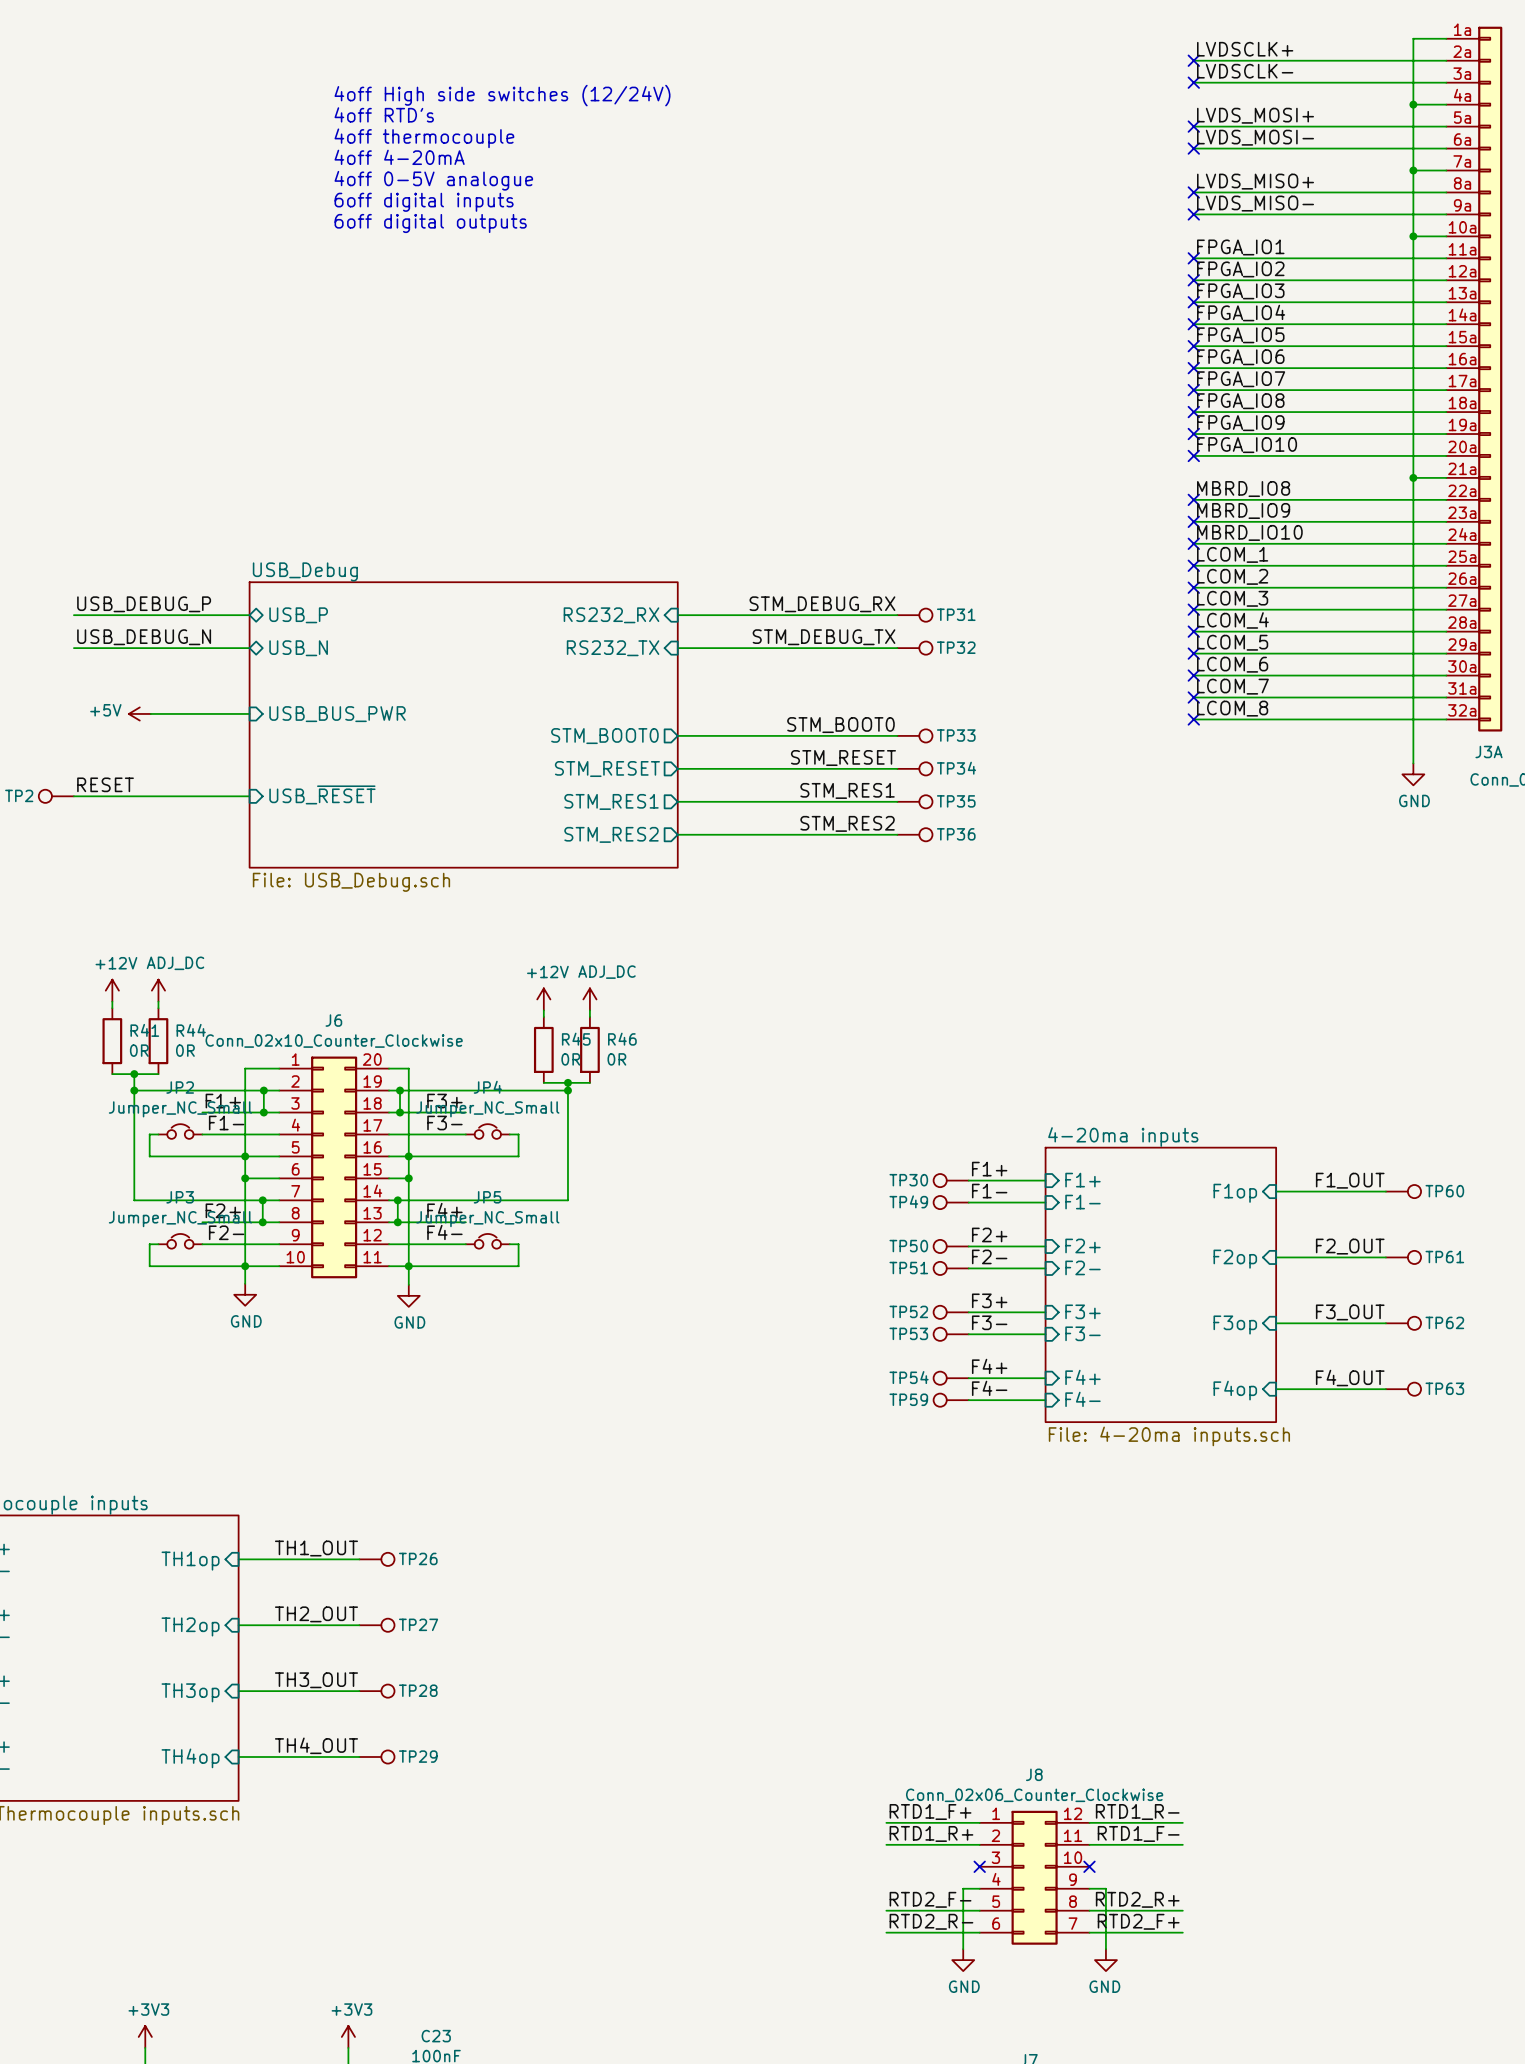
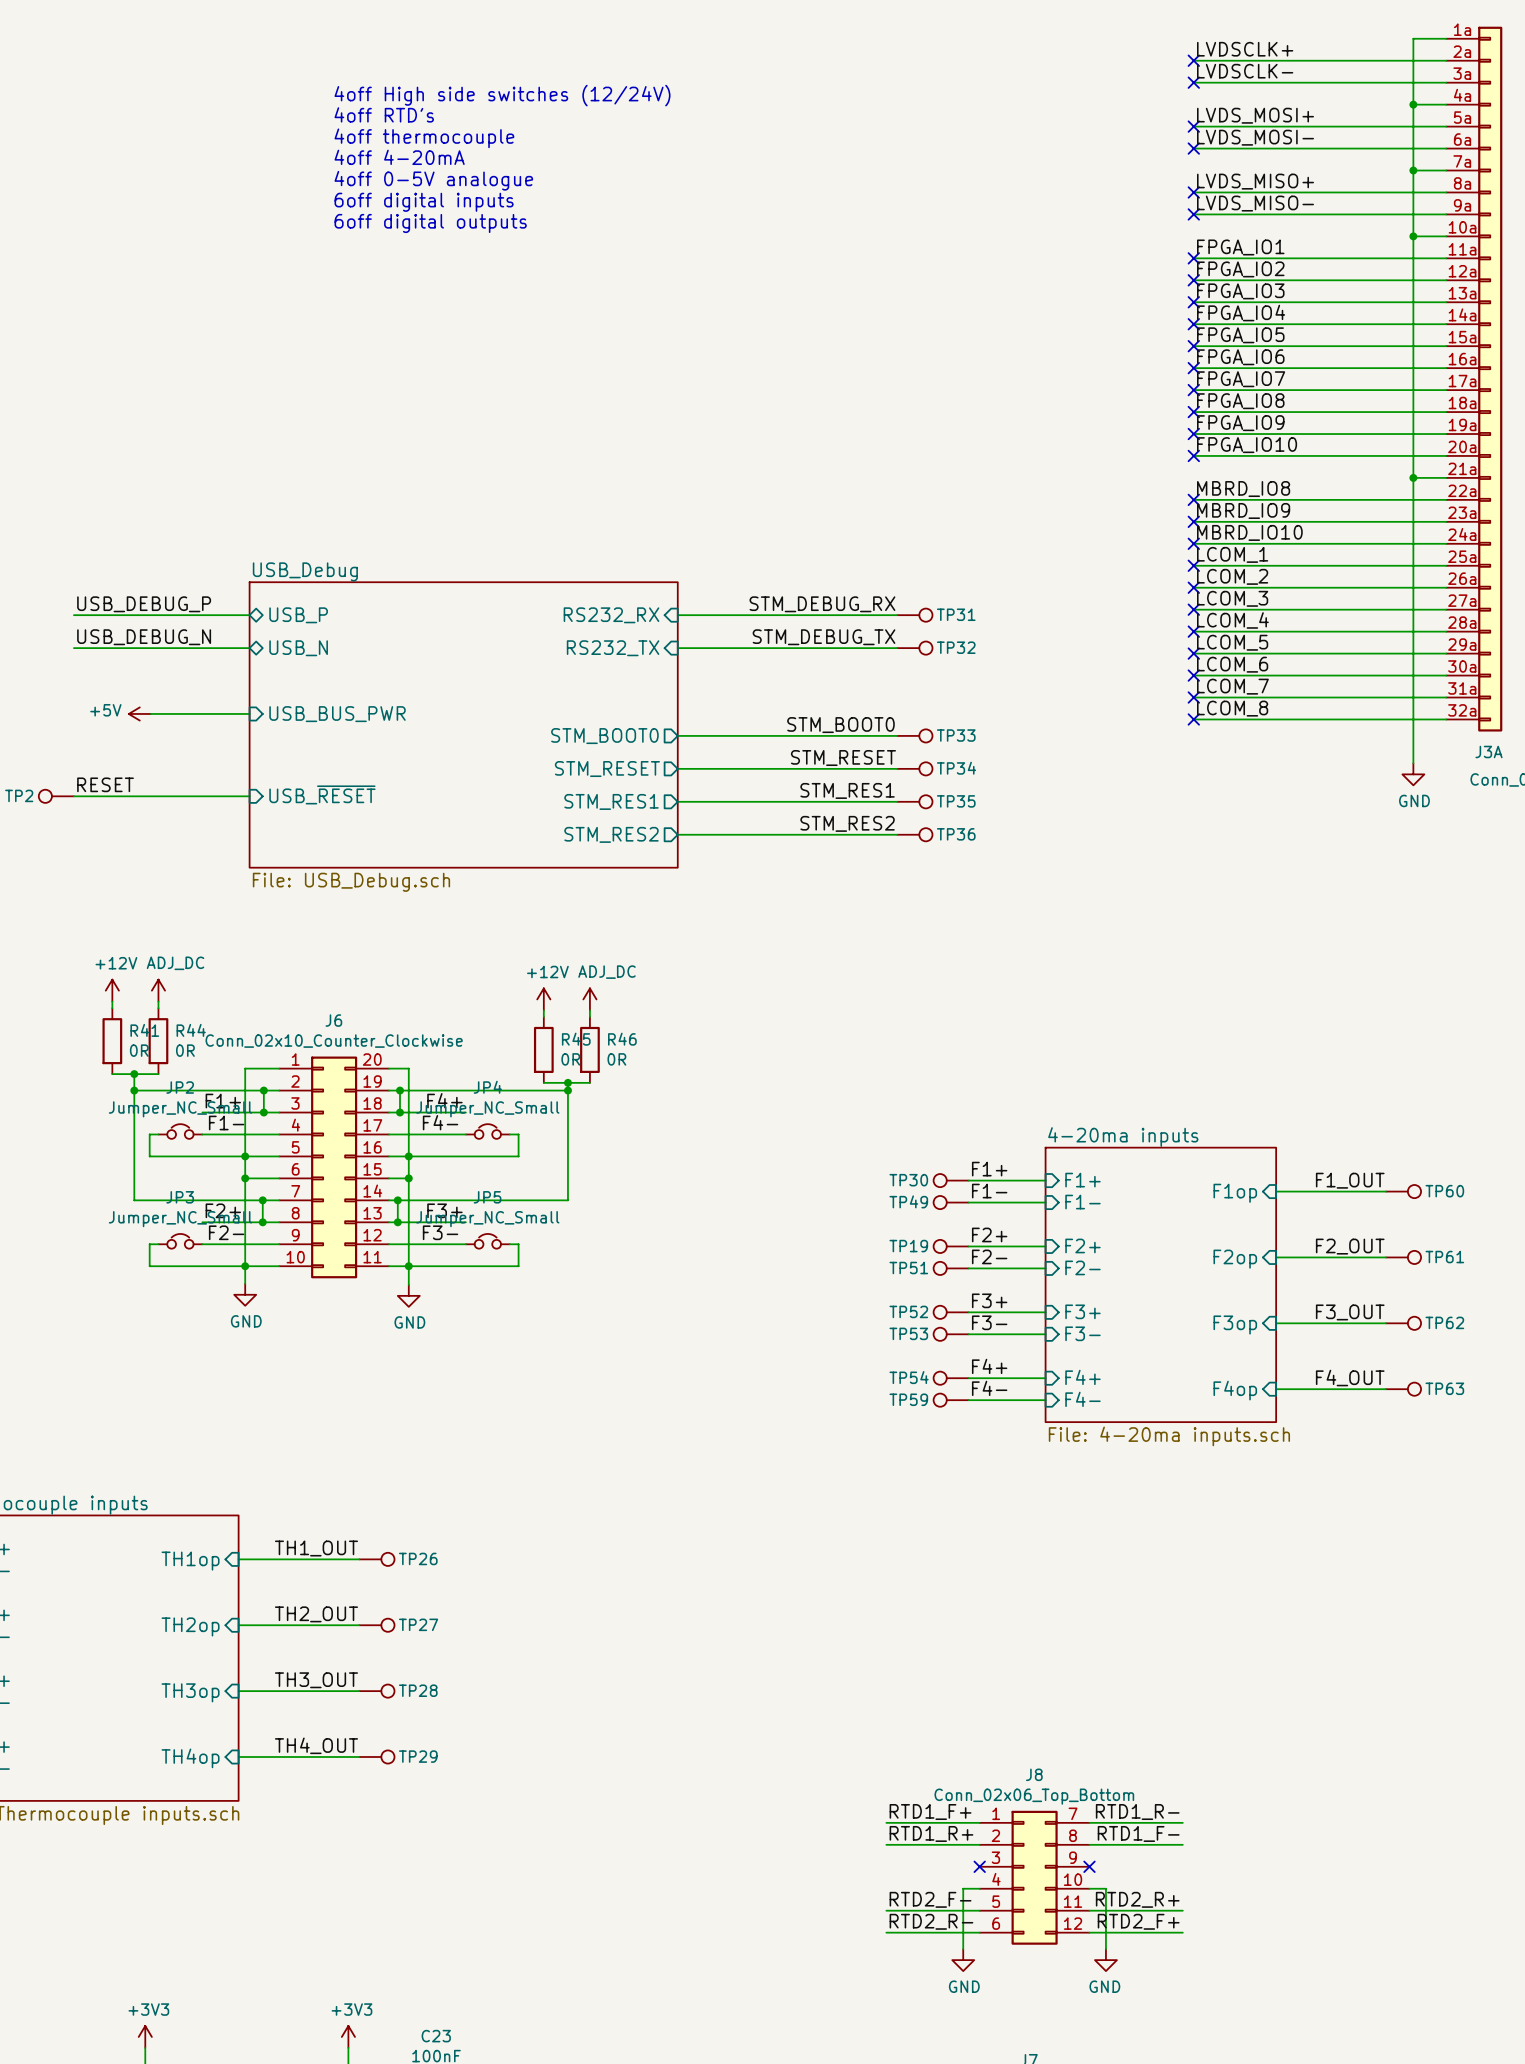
label: F3+ (444, 1101) -> F4+ (444, 1100)
label: F3- (444, 1122) -> F4- (440, 1122)
label: F4+ (444, 1210) -> F3+ (444, 1210)
label: F4- (444, 1232) -> F3- (440, 1232)
TP50 name: TP50 (908, 1246) -> TP19 (908, 1246)
J8 value: Conn_02x06_Counter_Clockwise (1034, 1795) -> Conn_02x06_Top_Bottom (1034, 1796)
J8 pin number: 12 (1073, 1813) -> 7 (1073, 1813)
J8 pin number: 11 (1073, 1835) -> 8 (1073, 1835)
J8 pin number: 10 (1073, 1857) -> 9 (1073, 1857)
J8 pin number: 9 (1073, 1879) -> 10 (1073, 1879)
J8 pin number: 8 (1073, 1901) -> 11 (1073, 1901)
J8 pin number: 7 (1073, 1923) -> 12 (1073, 1923)

